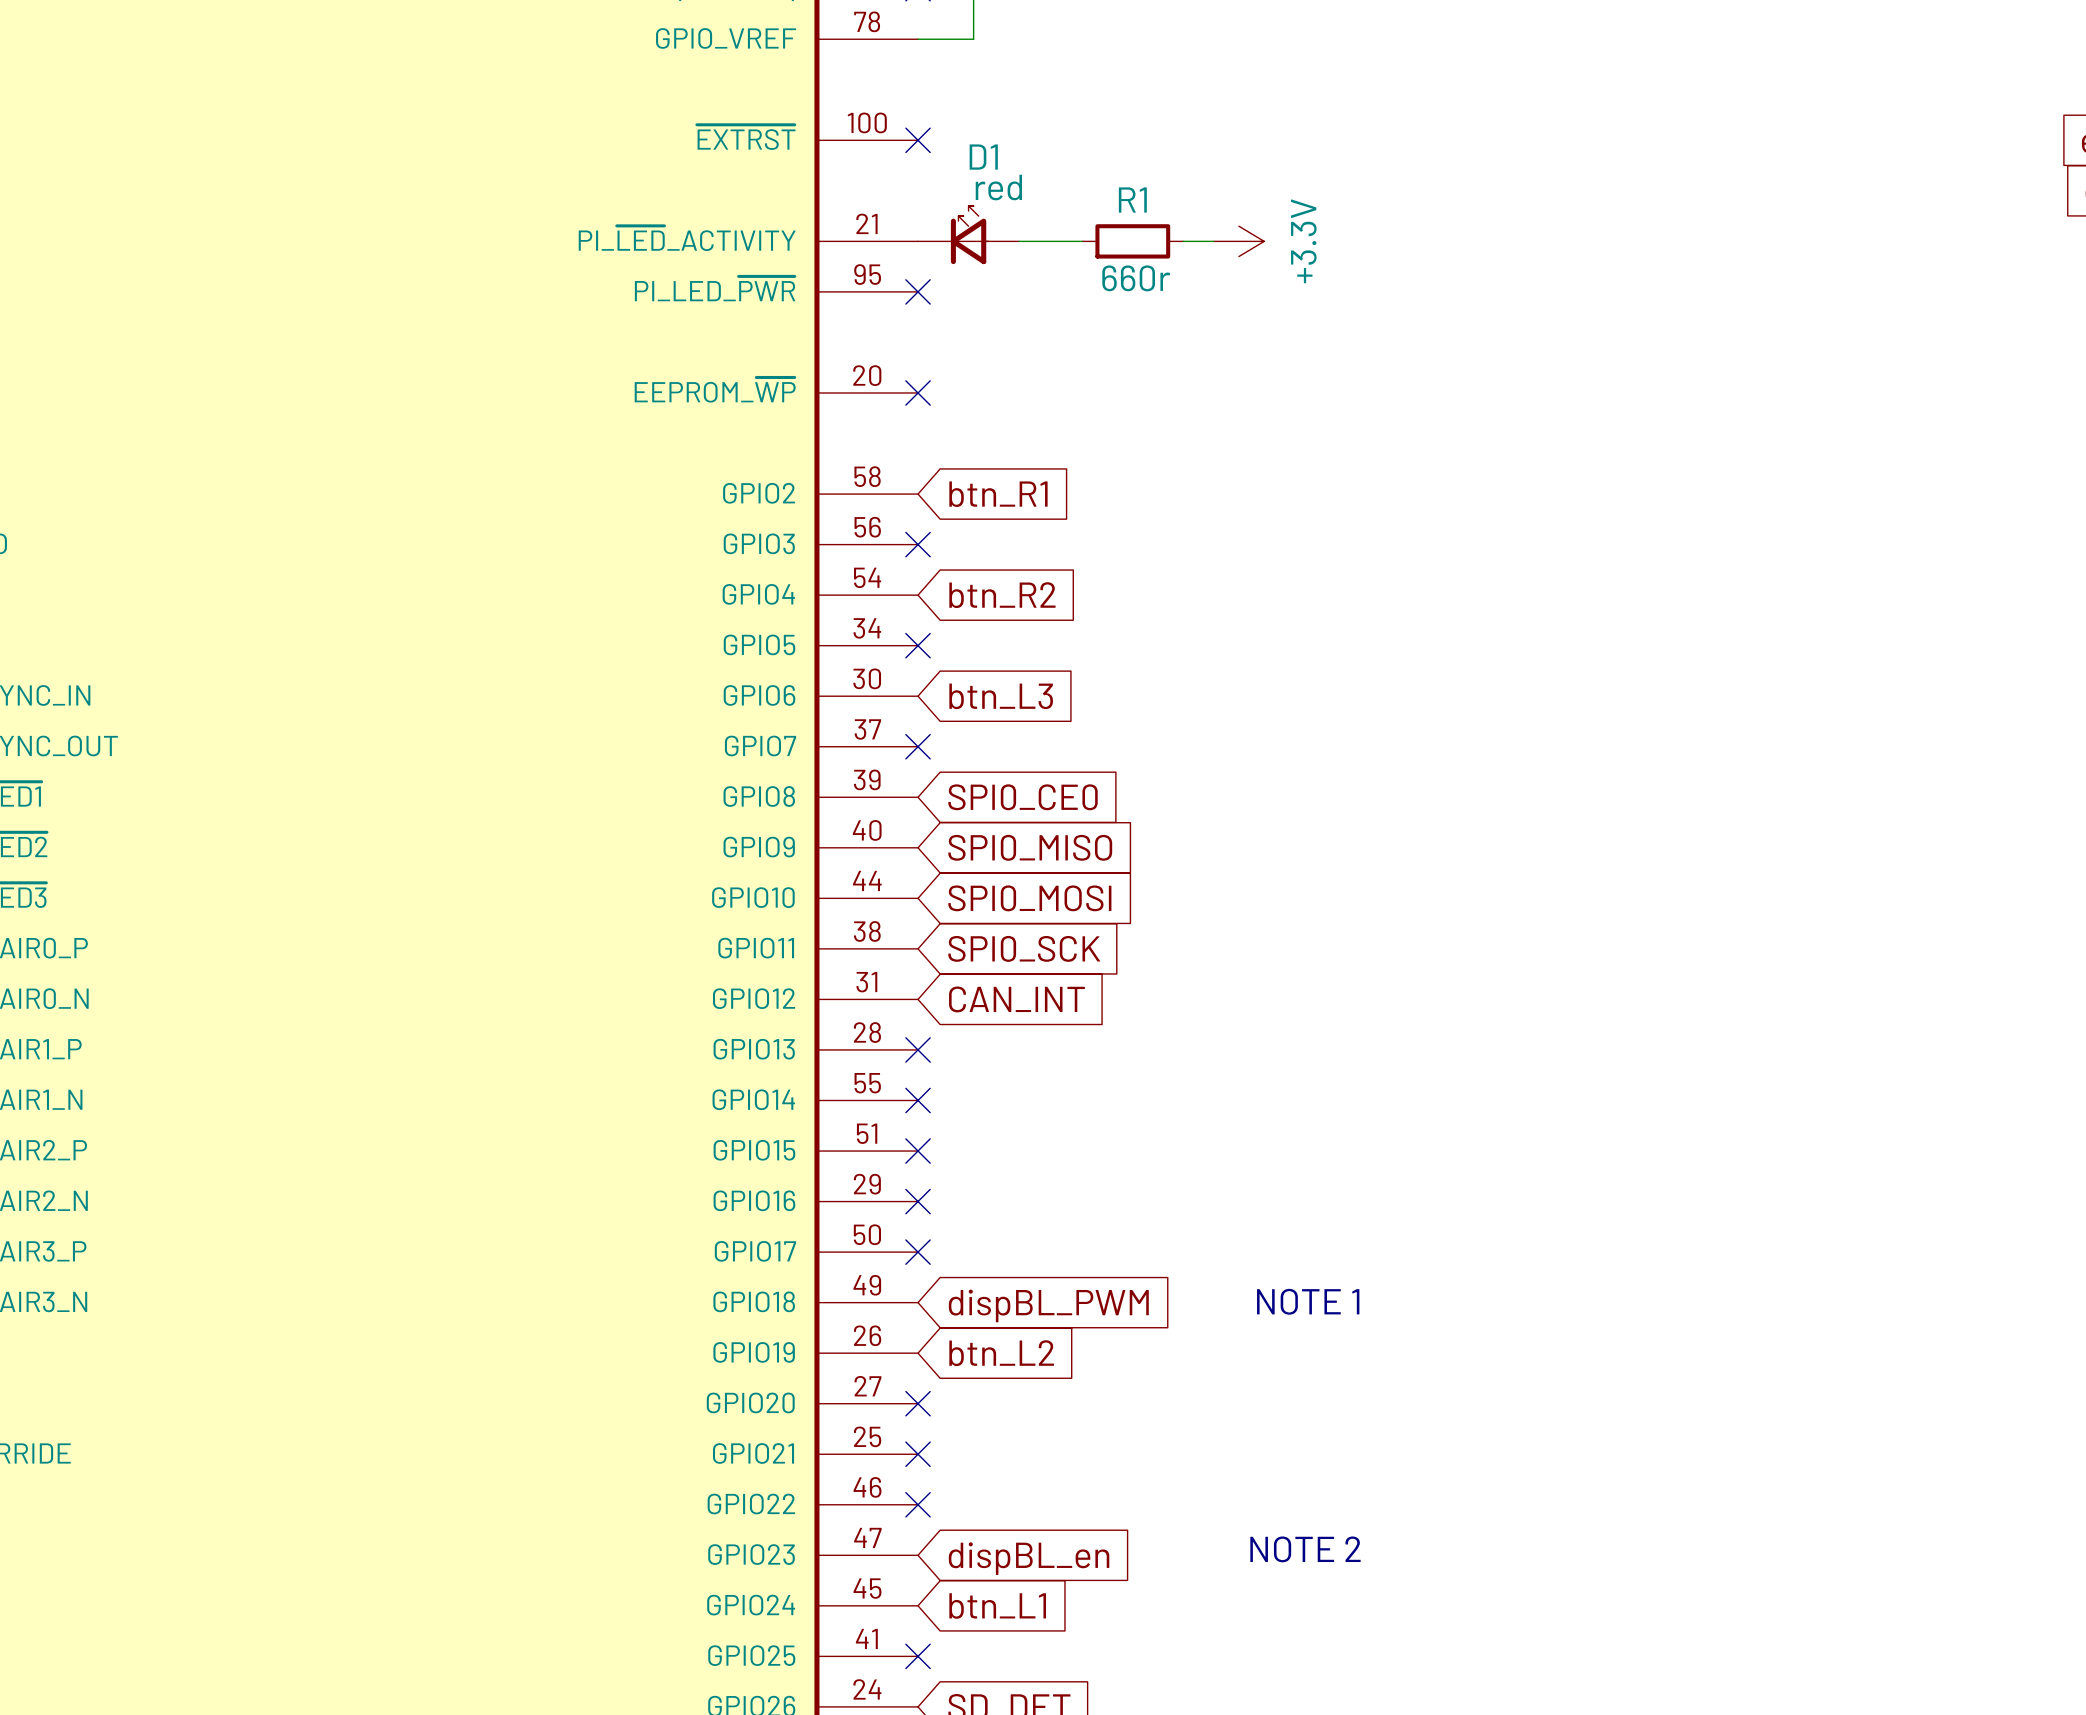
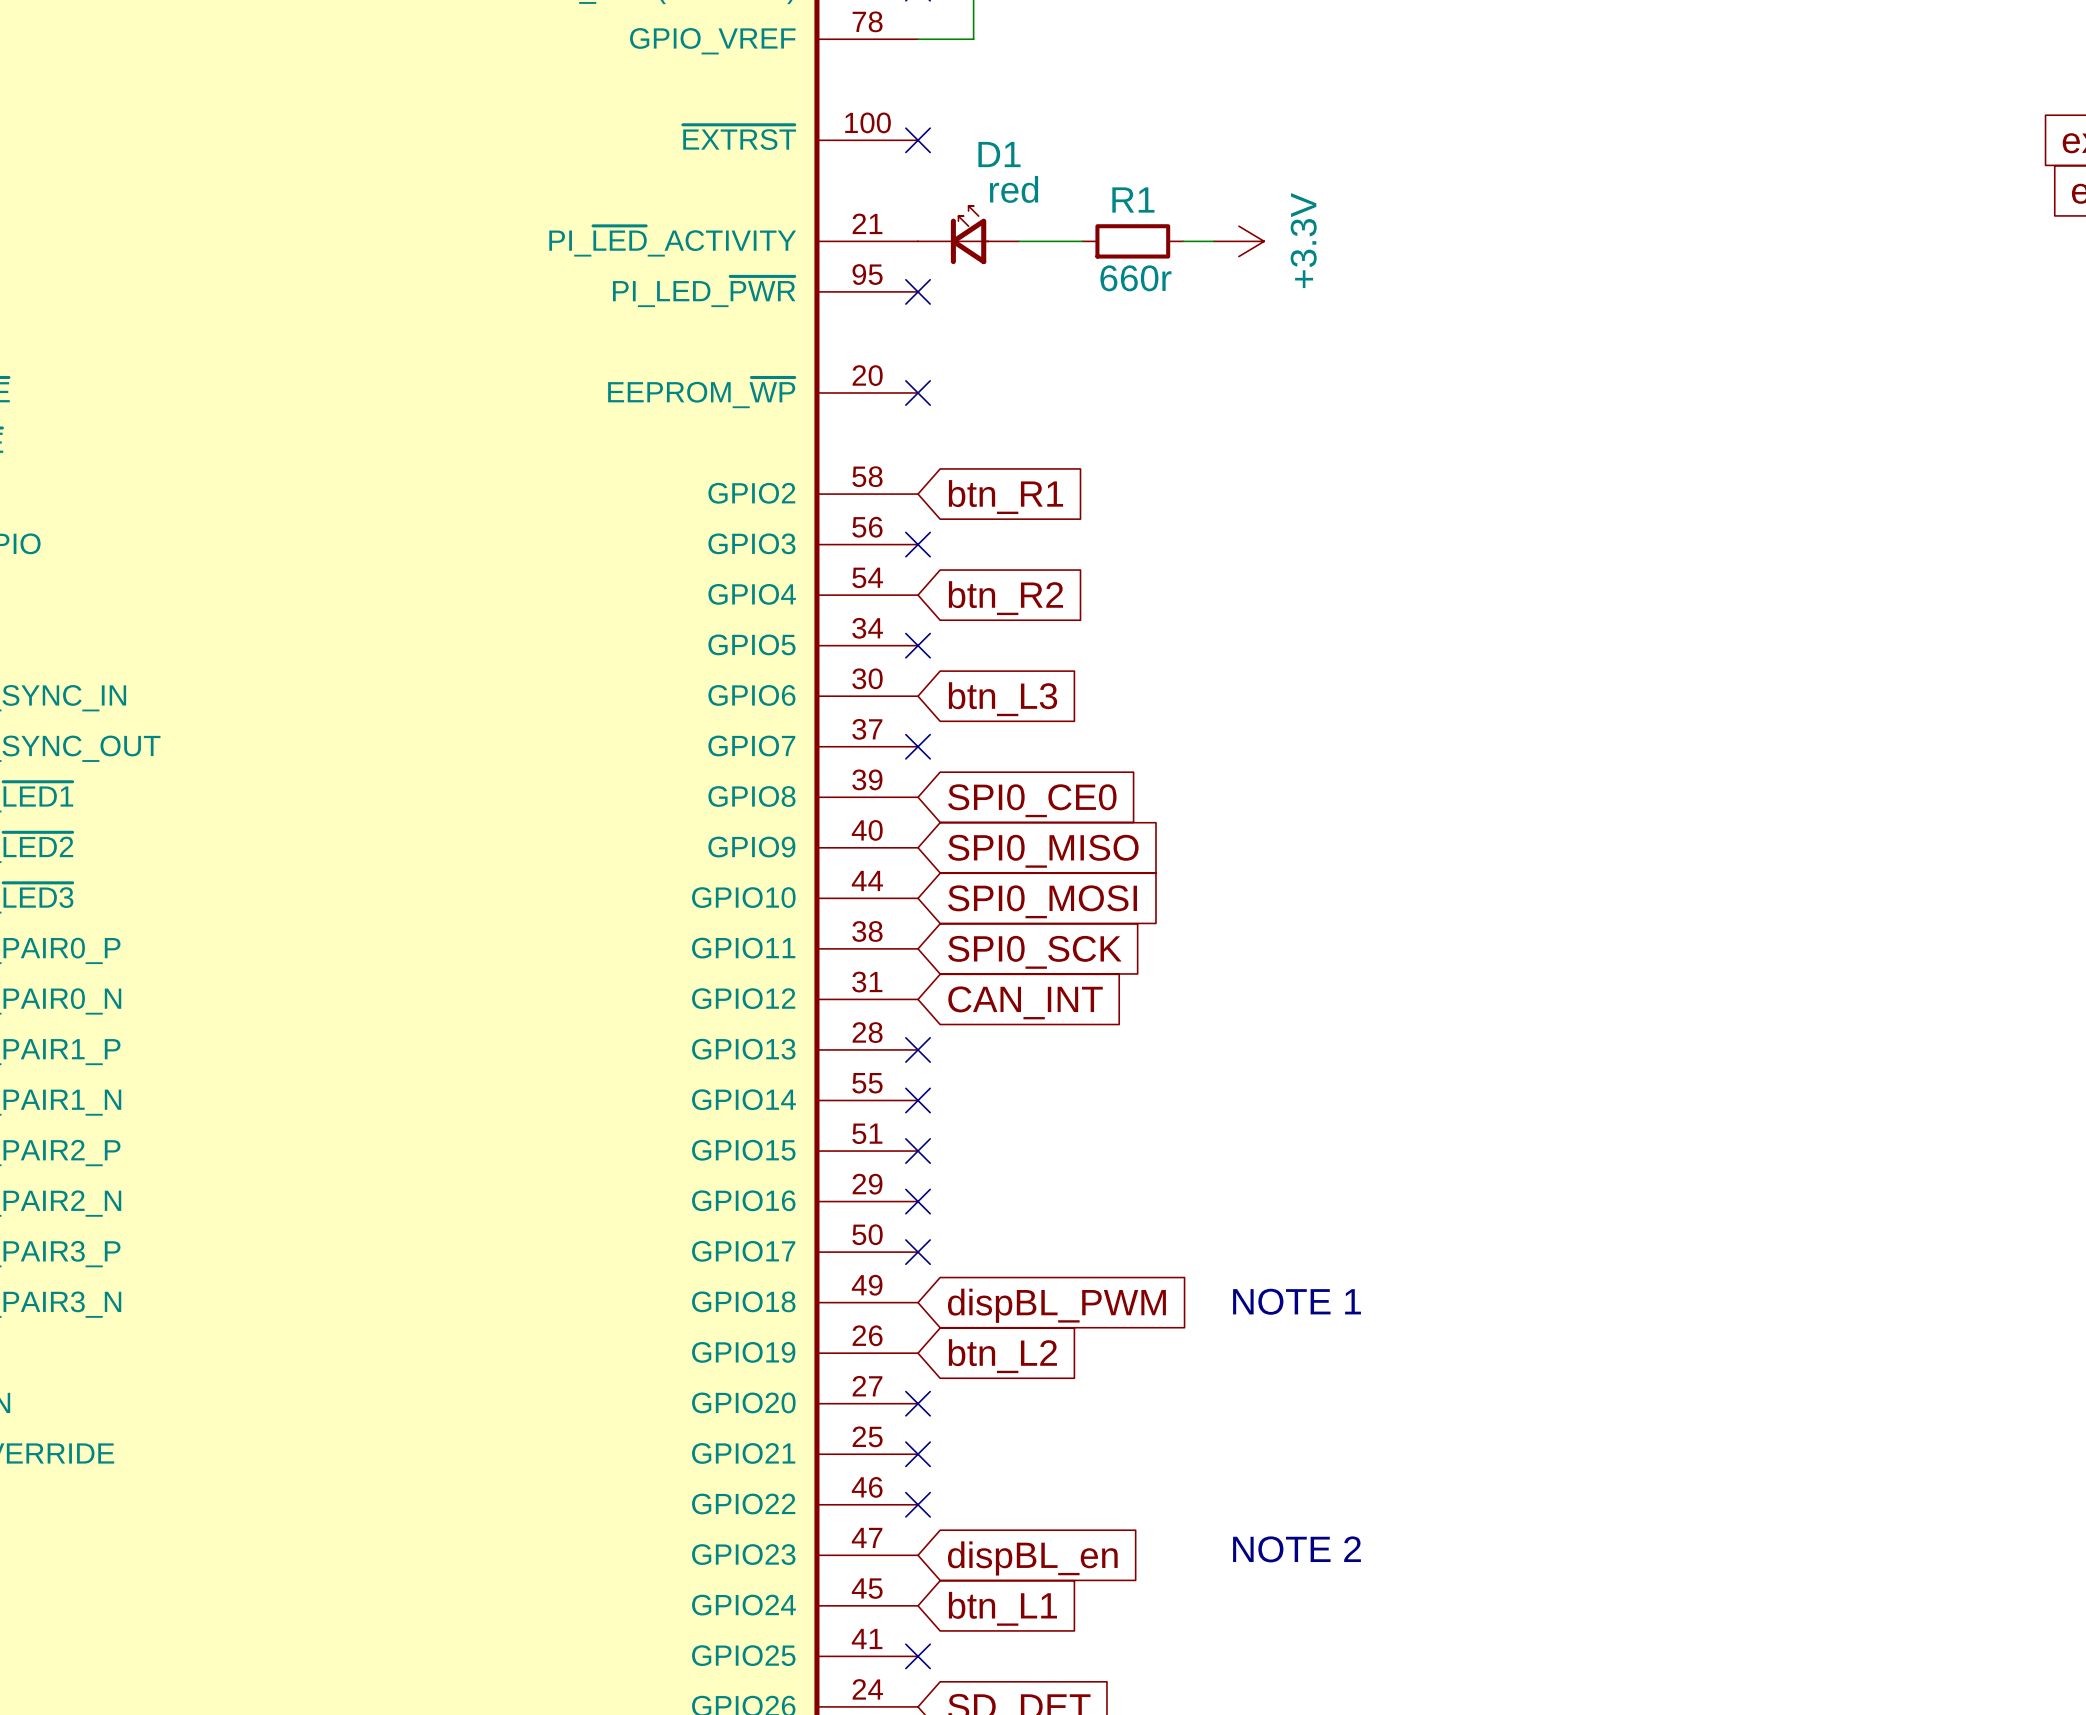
D1 name position: D1 (983, 157) -> D1 (999, 154)
D1 value position: red (998, 187) -> red (1014, 189)

